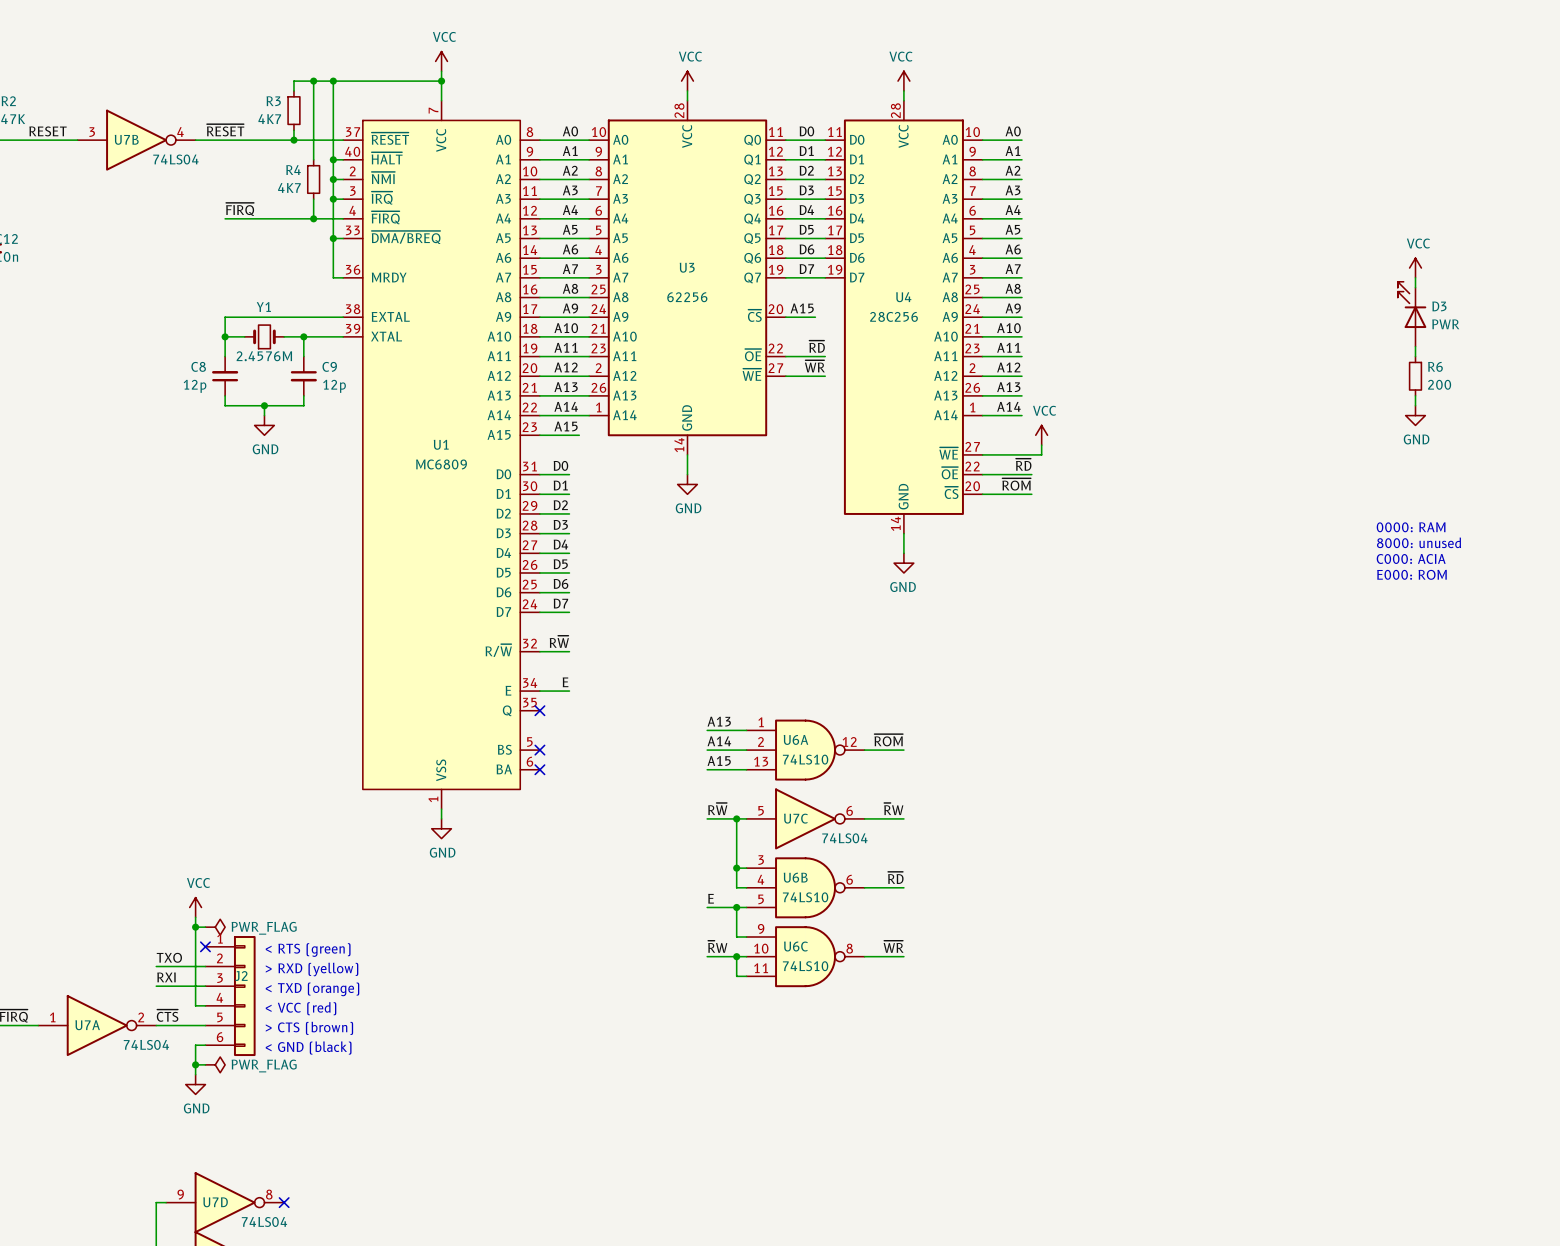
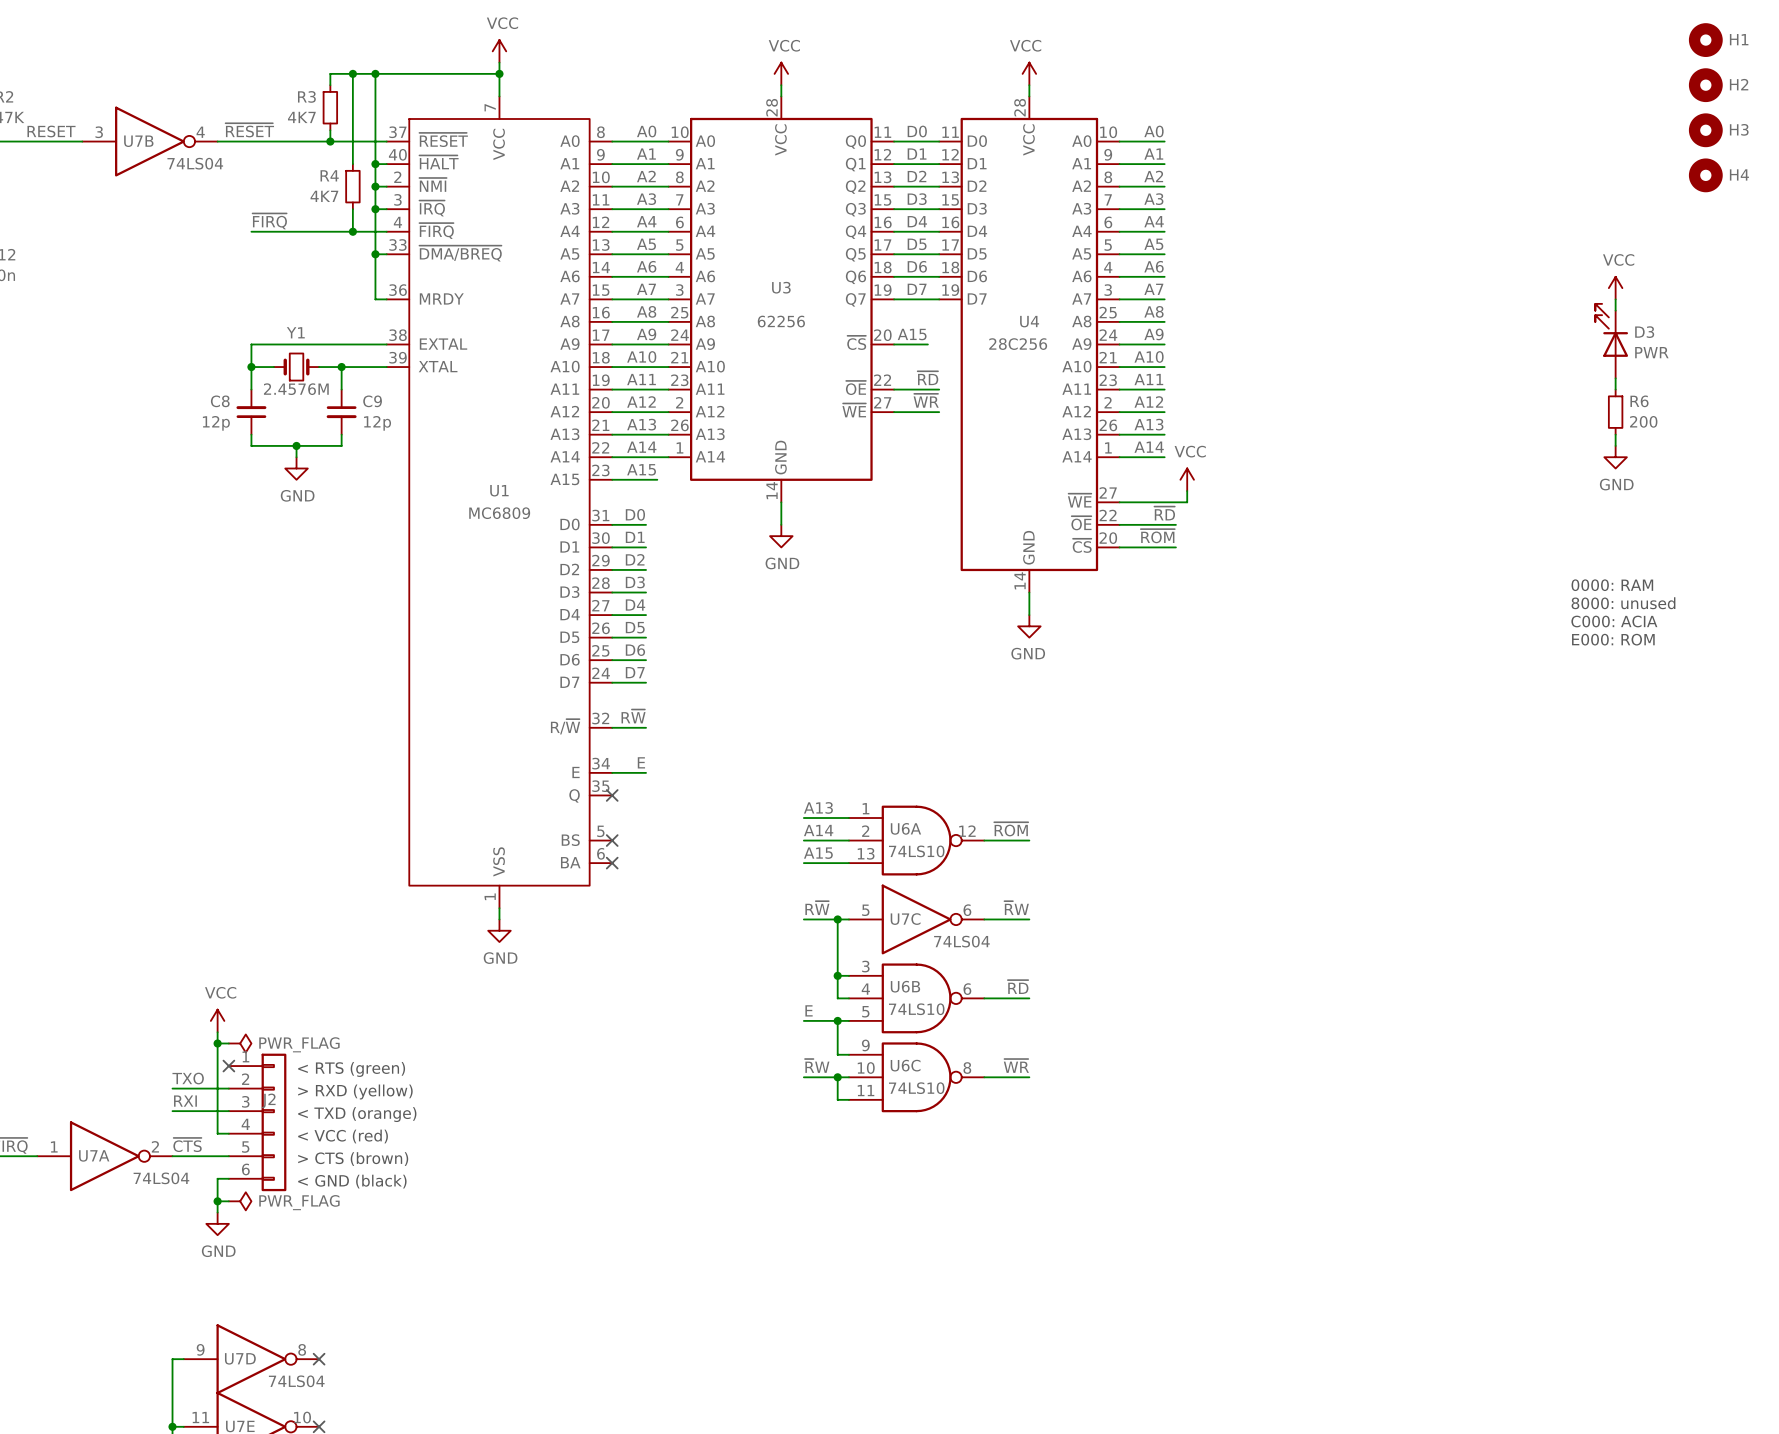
H1: none -> (1705, 40)
H2: none -> (1705, 85)
H3: none -> (1705, 130)
H4: none -> (1705, 175)

